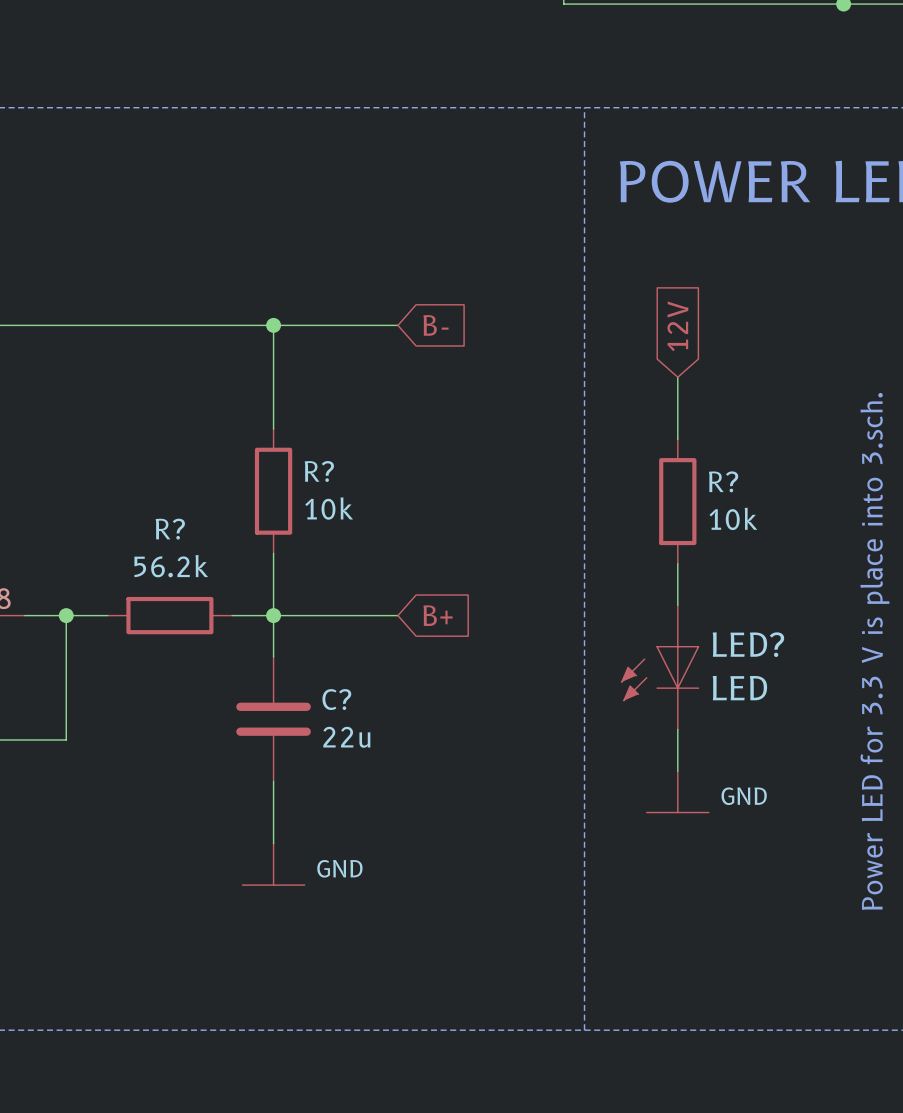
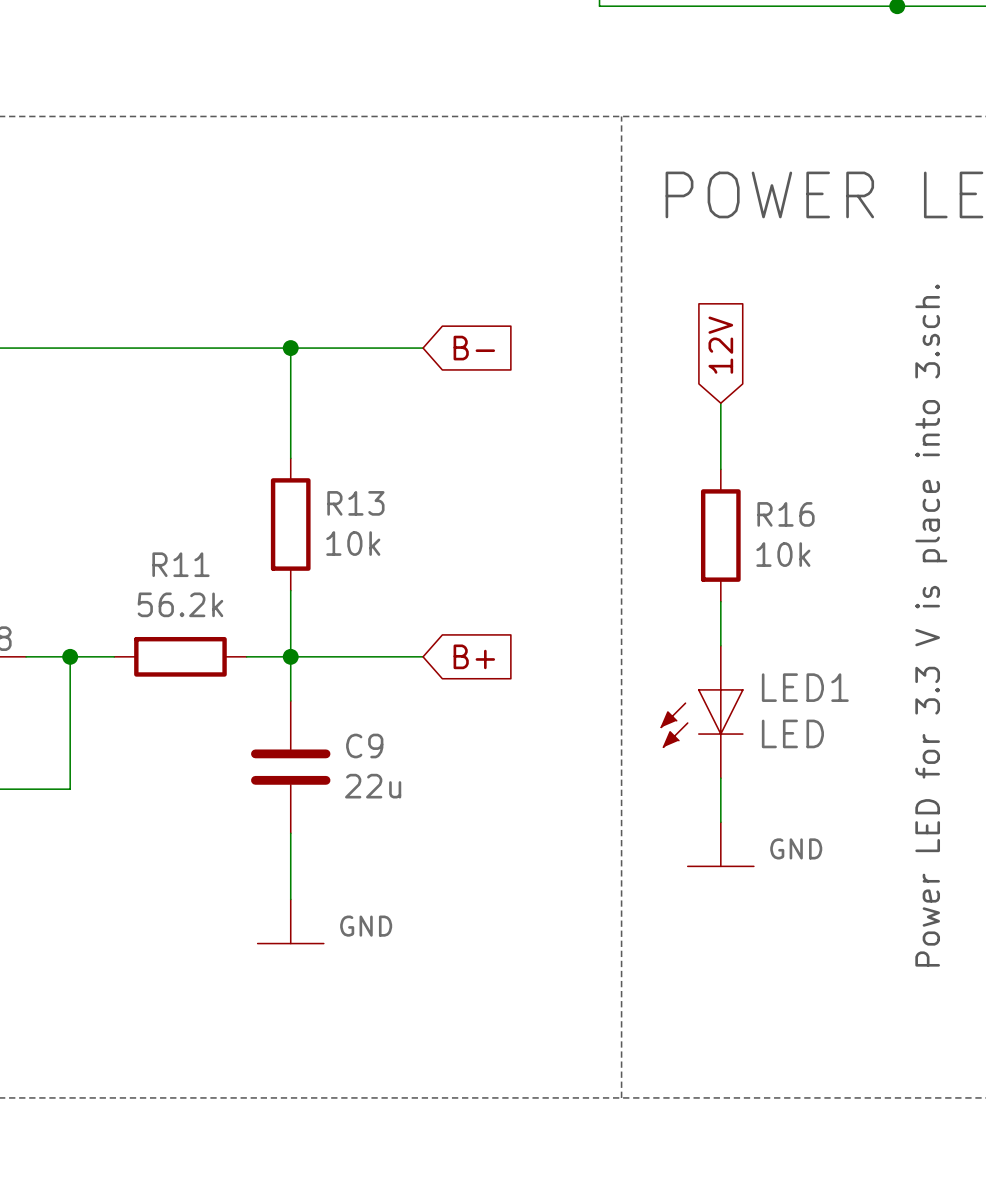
R? name: R? (319, 471) -> R13 (355, 503)
R? name: R? (723, 481) -> R16 (786, 514)
R? name: R? (170, 529) -> R11 (180, 564)
LED? name: LED? (748, 644) -> LED1 (805, 687)
C? name: C? (336, 699) -> C9 (364, 746)

